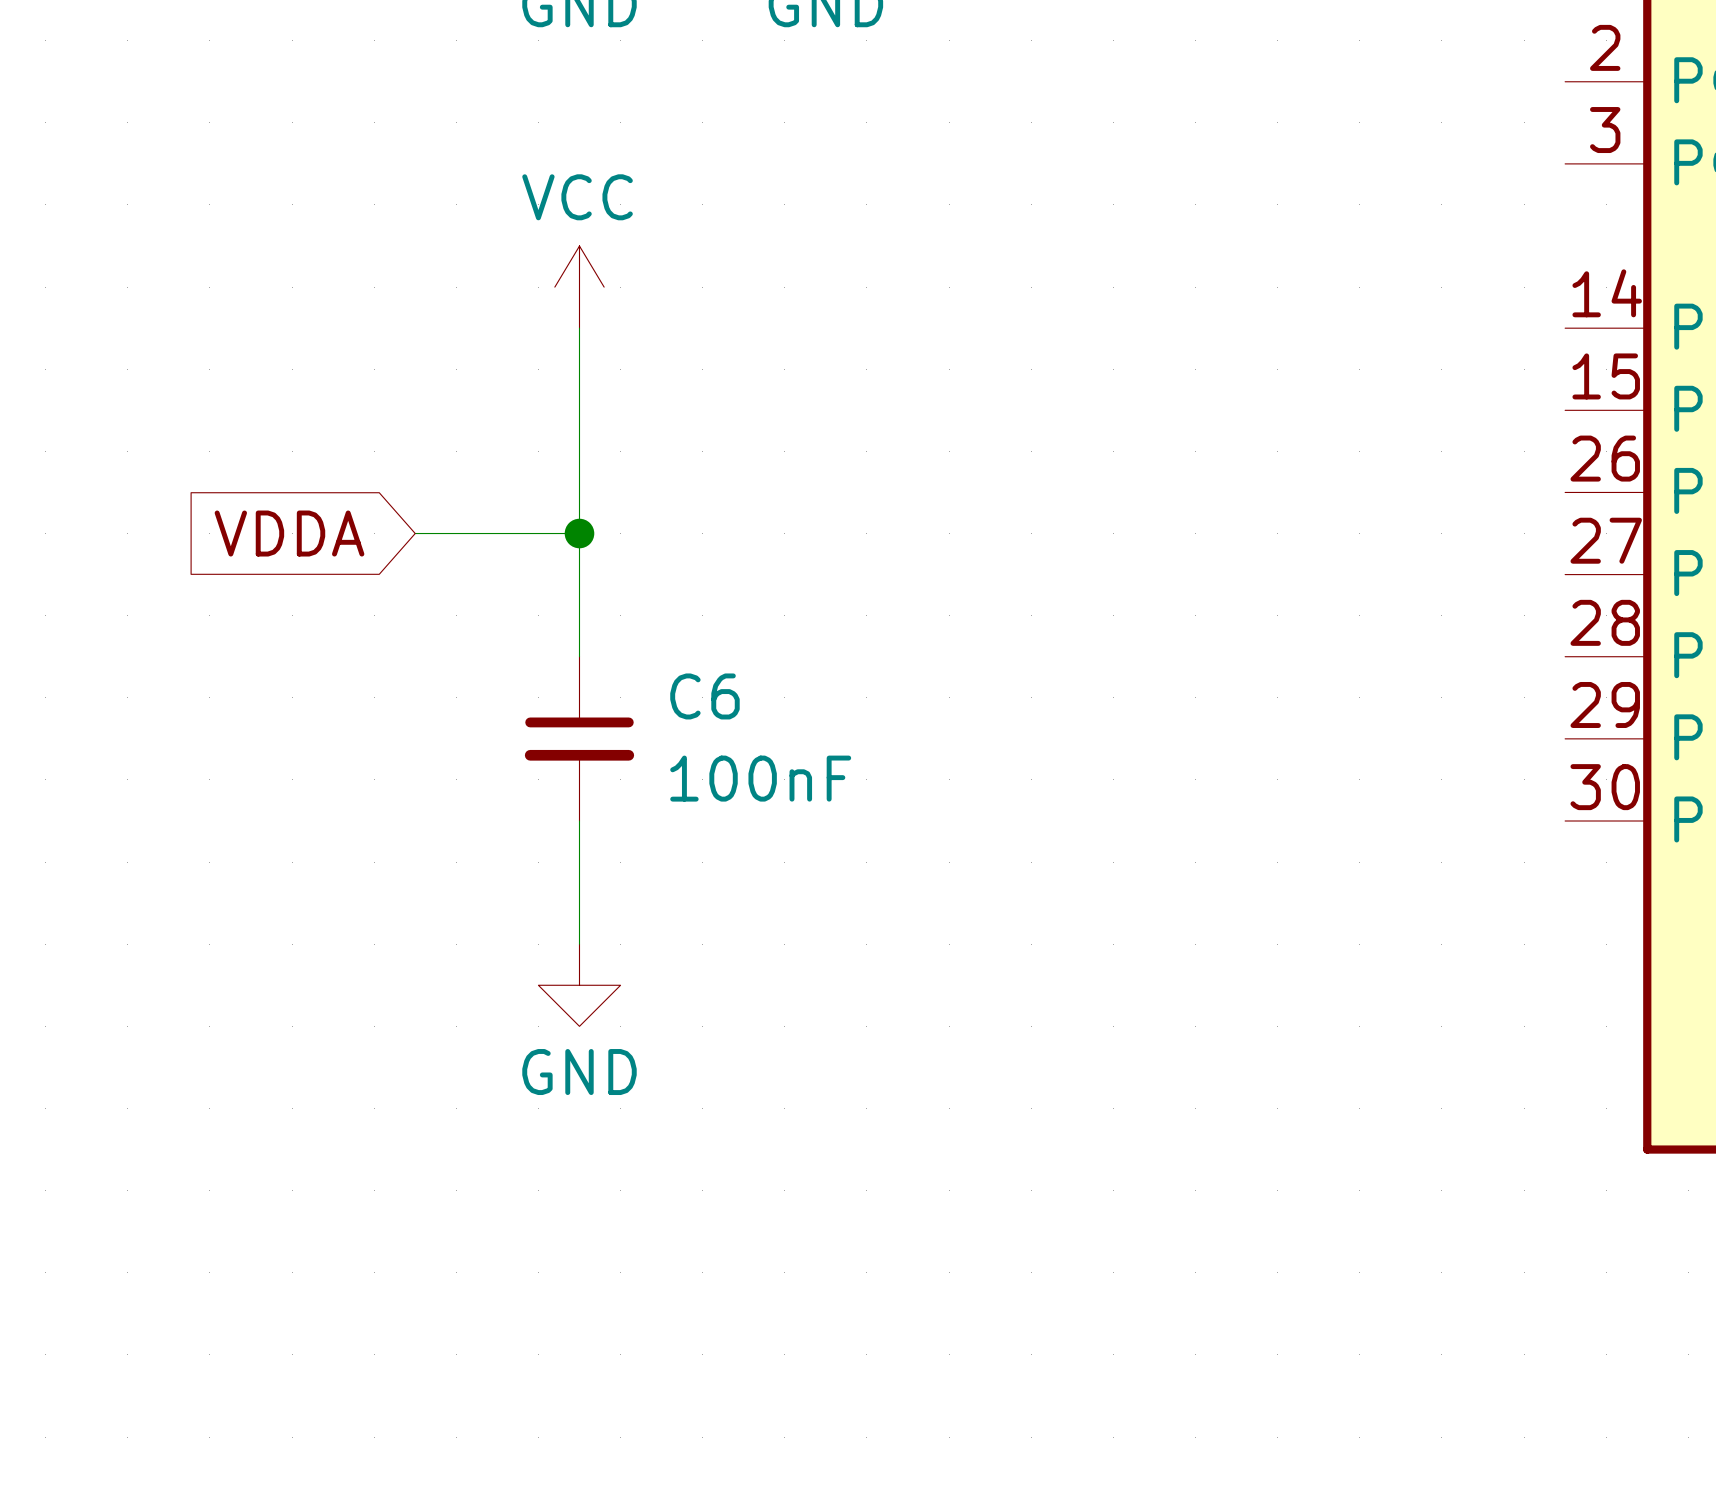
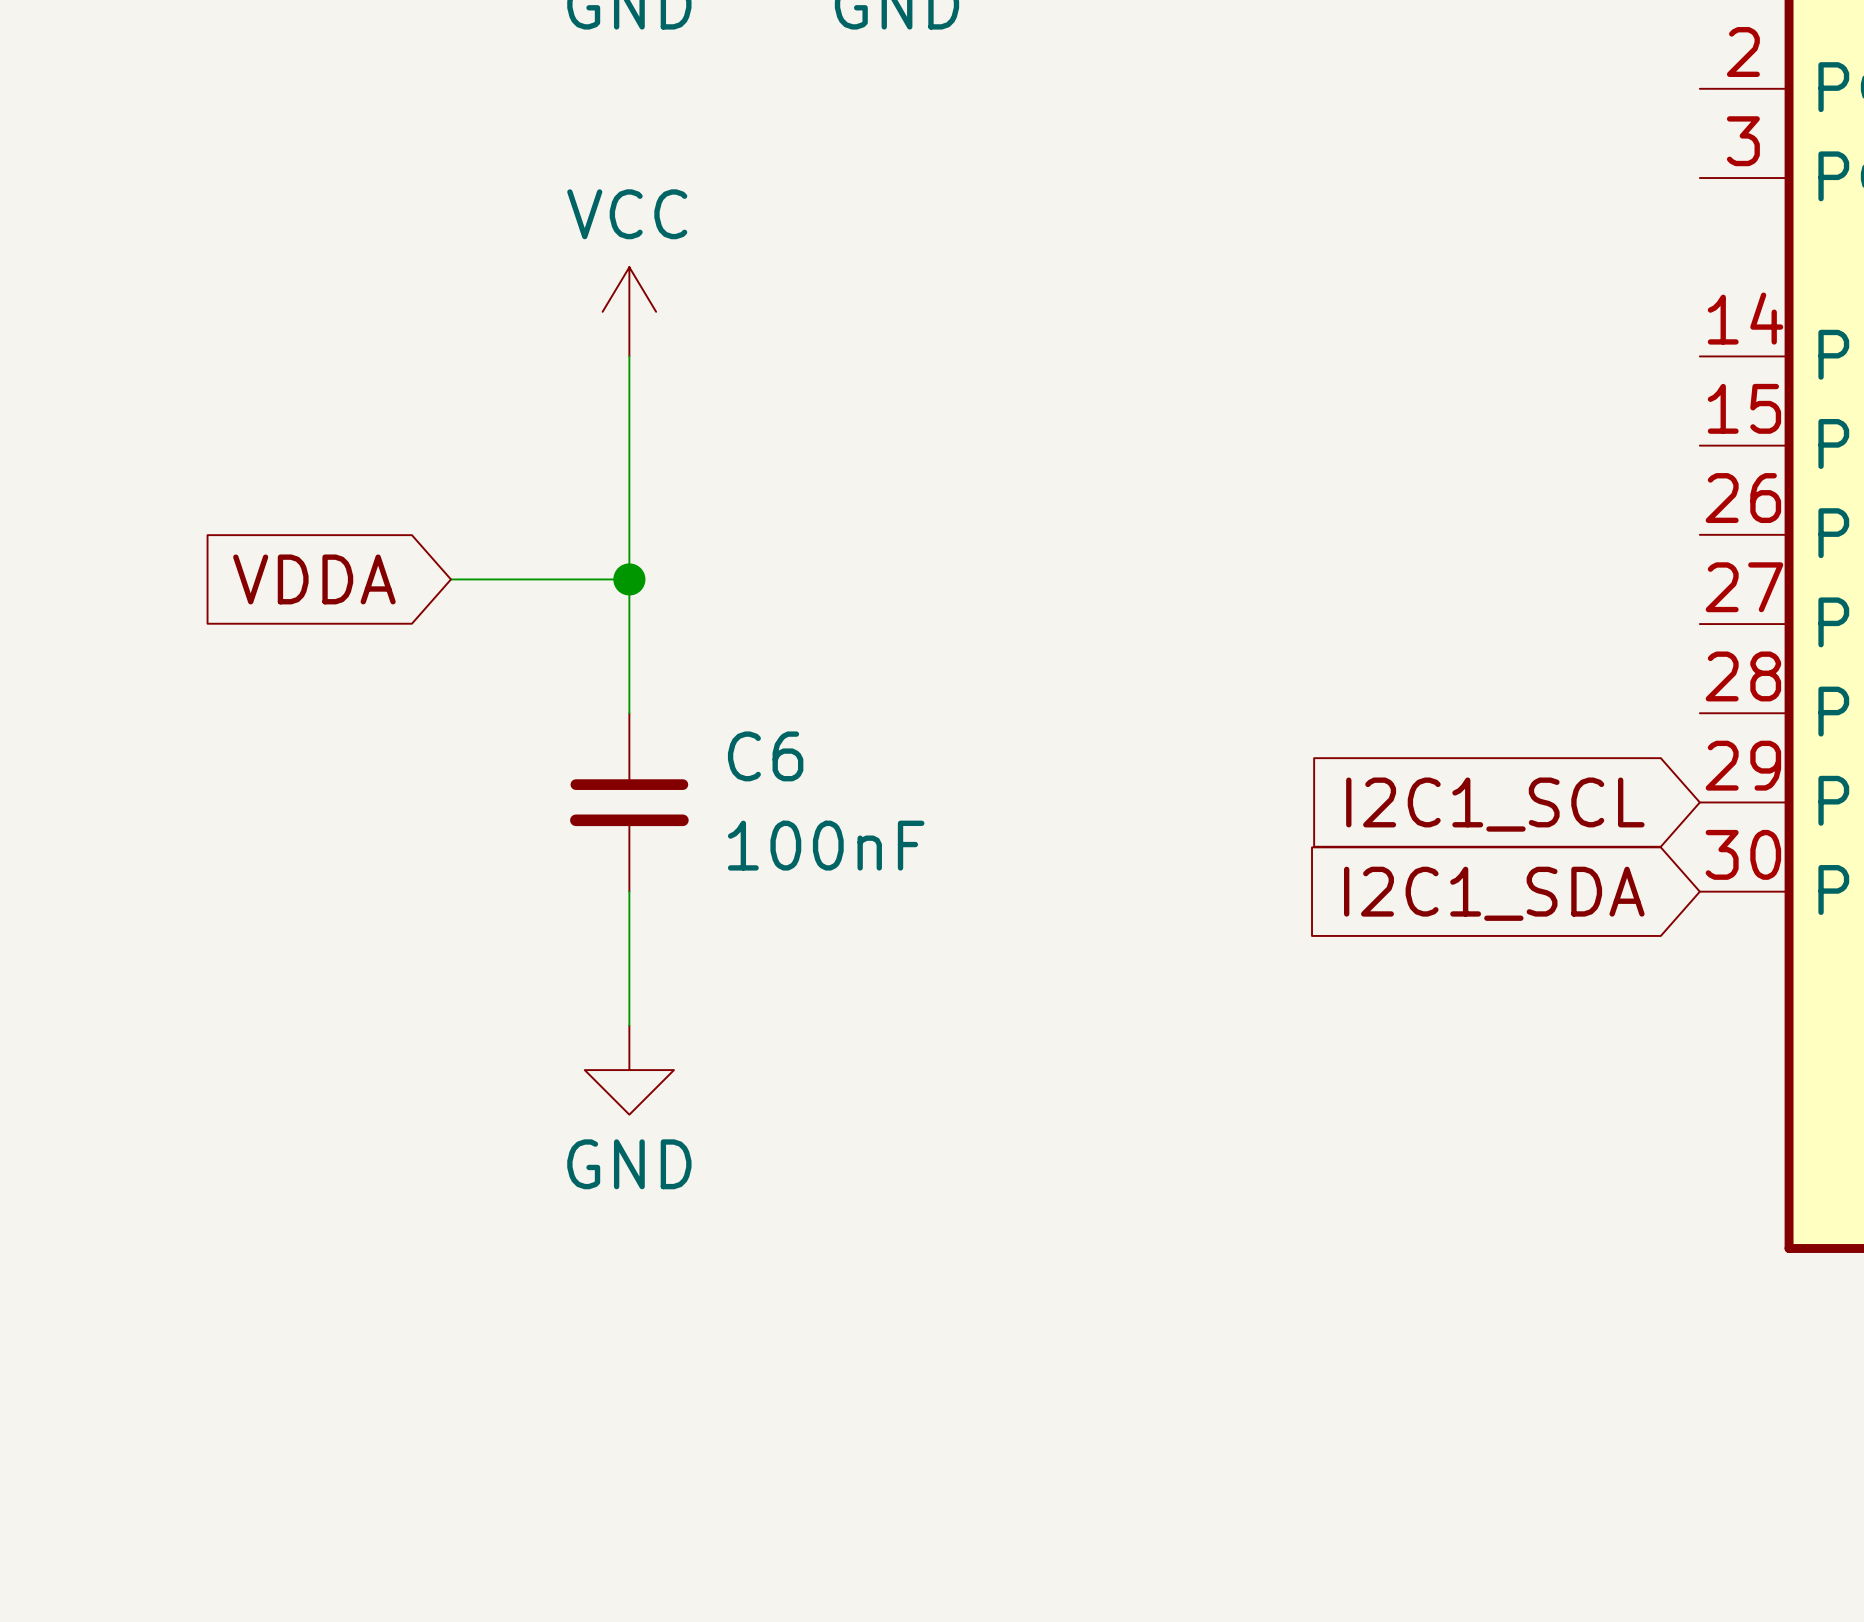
global label: none -> I2C1_SCL (1495, 804)
global label: none -> I2C1_SDA (1494, 893)

